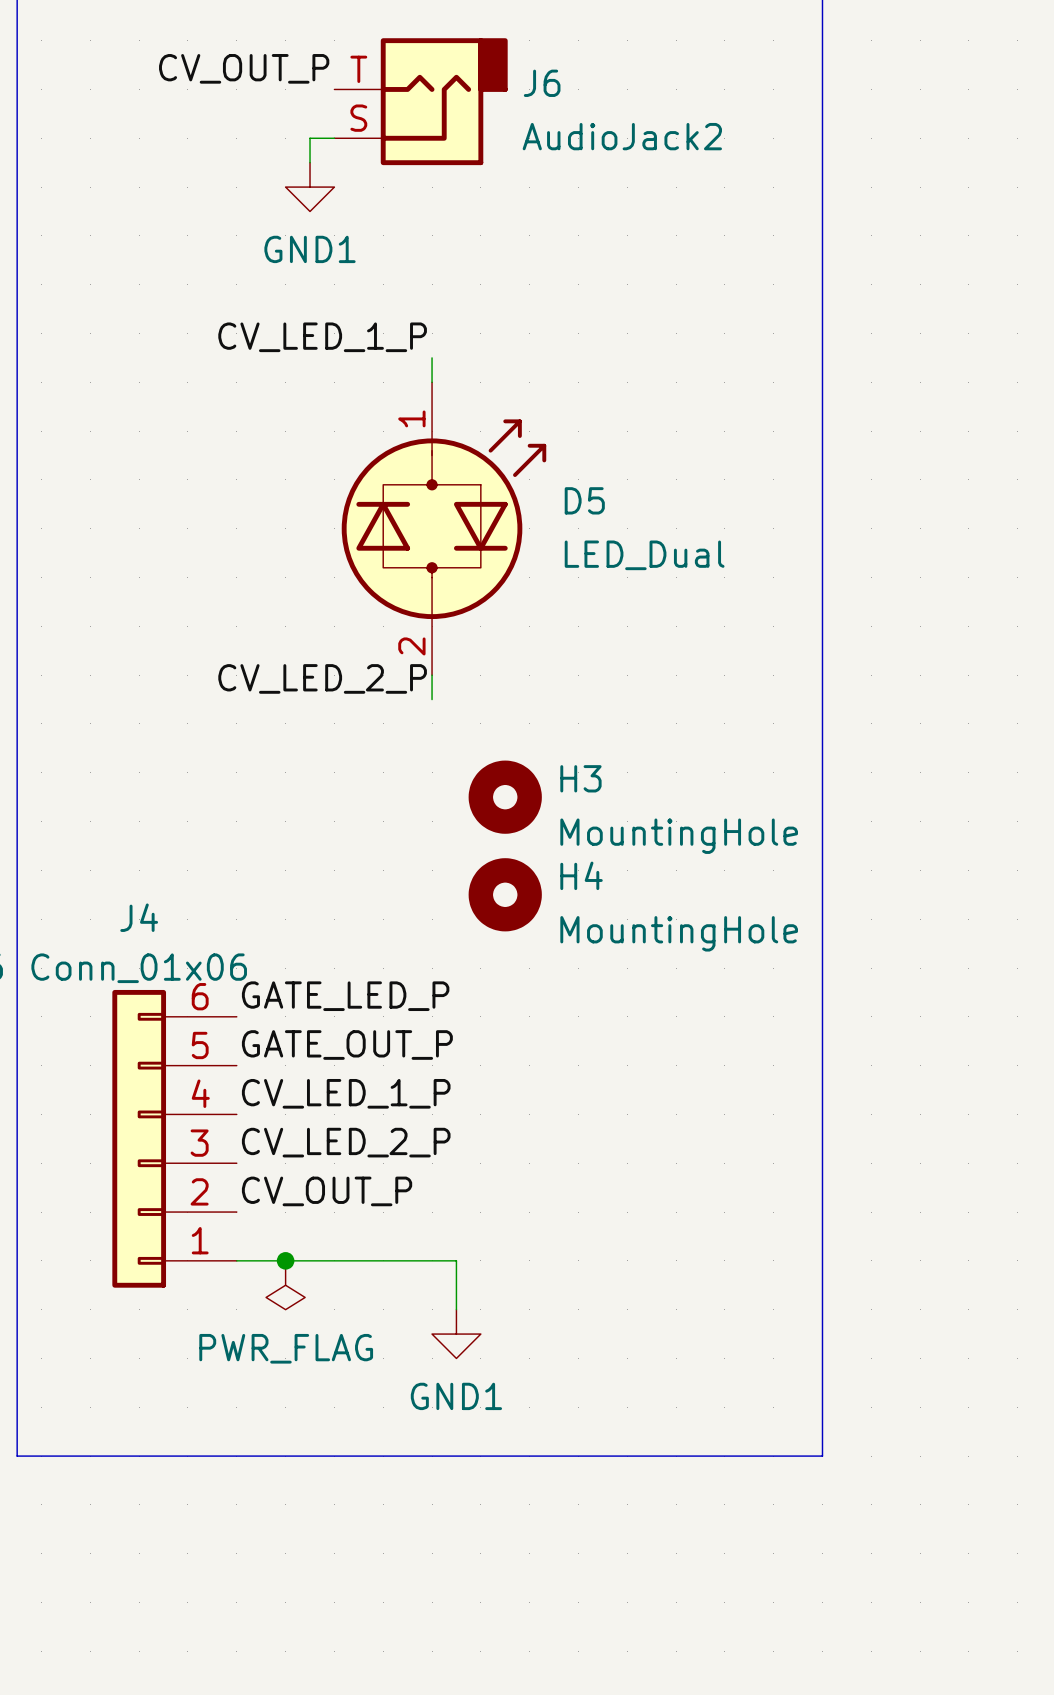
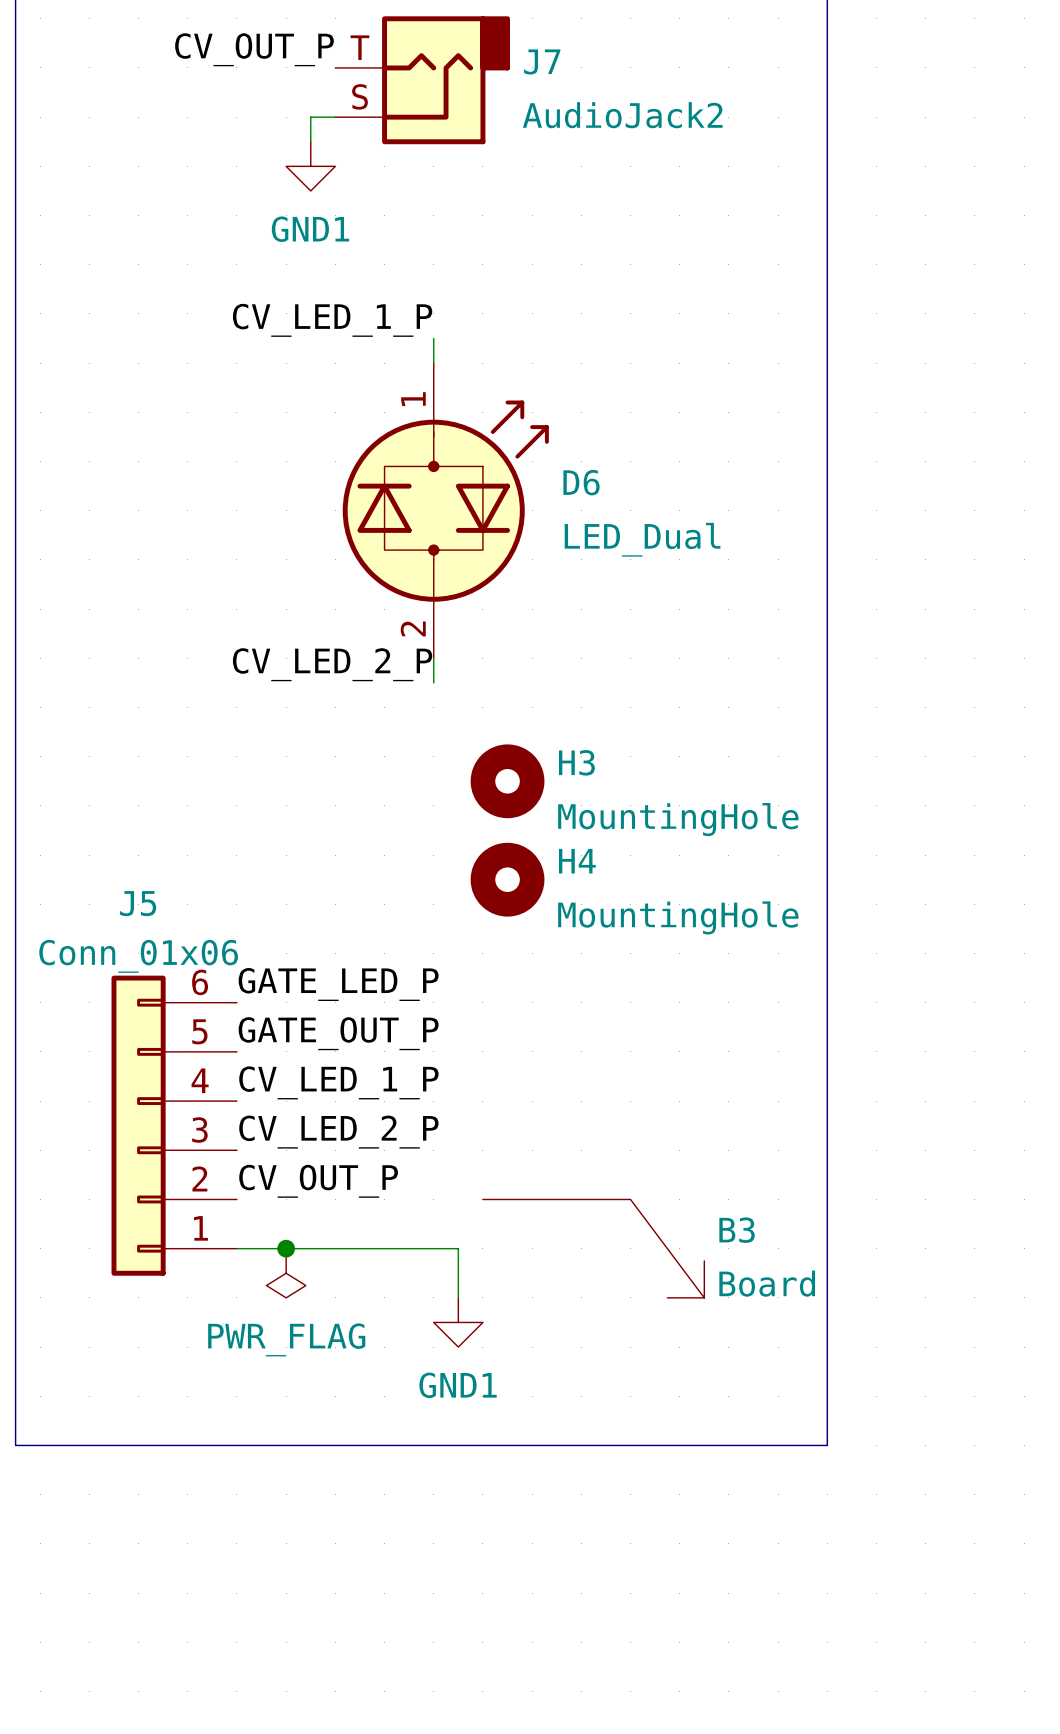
J6 name: J6 (542, 83) -> J7 (542, 61)
D5 name: D5 (584, 500) -> D6 (581, 482)
J4 name: J4 (139, 917) -> J5 (138, 903)
B3: none -> Board (593, 1248)

